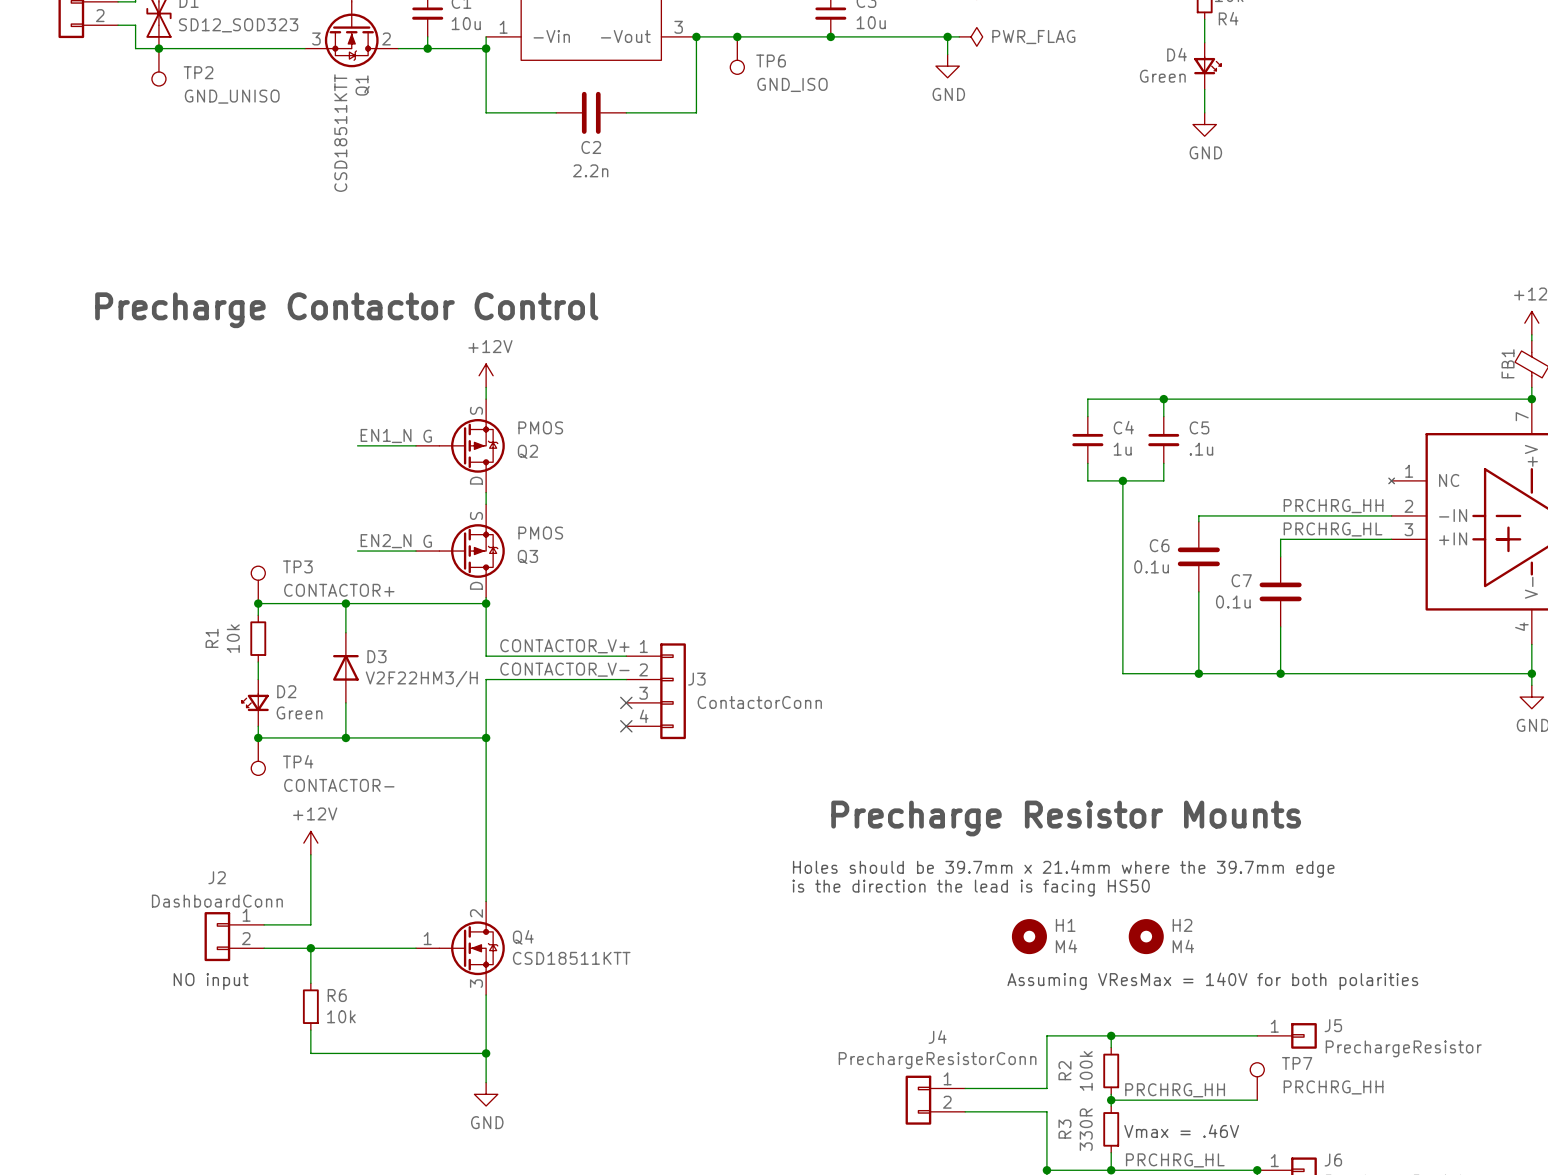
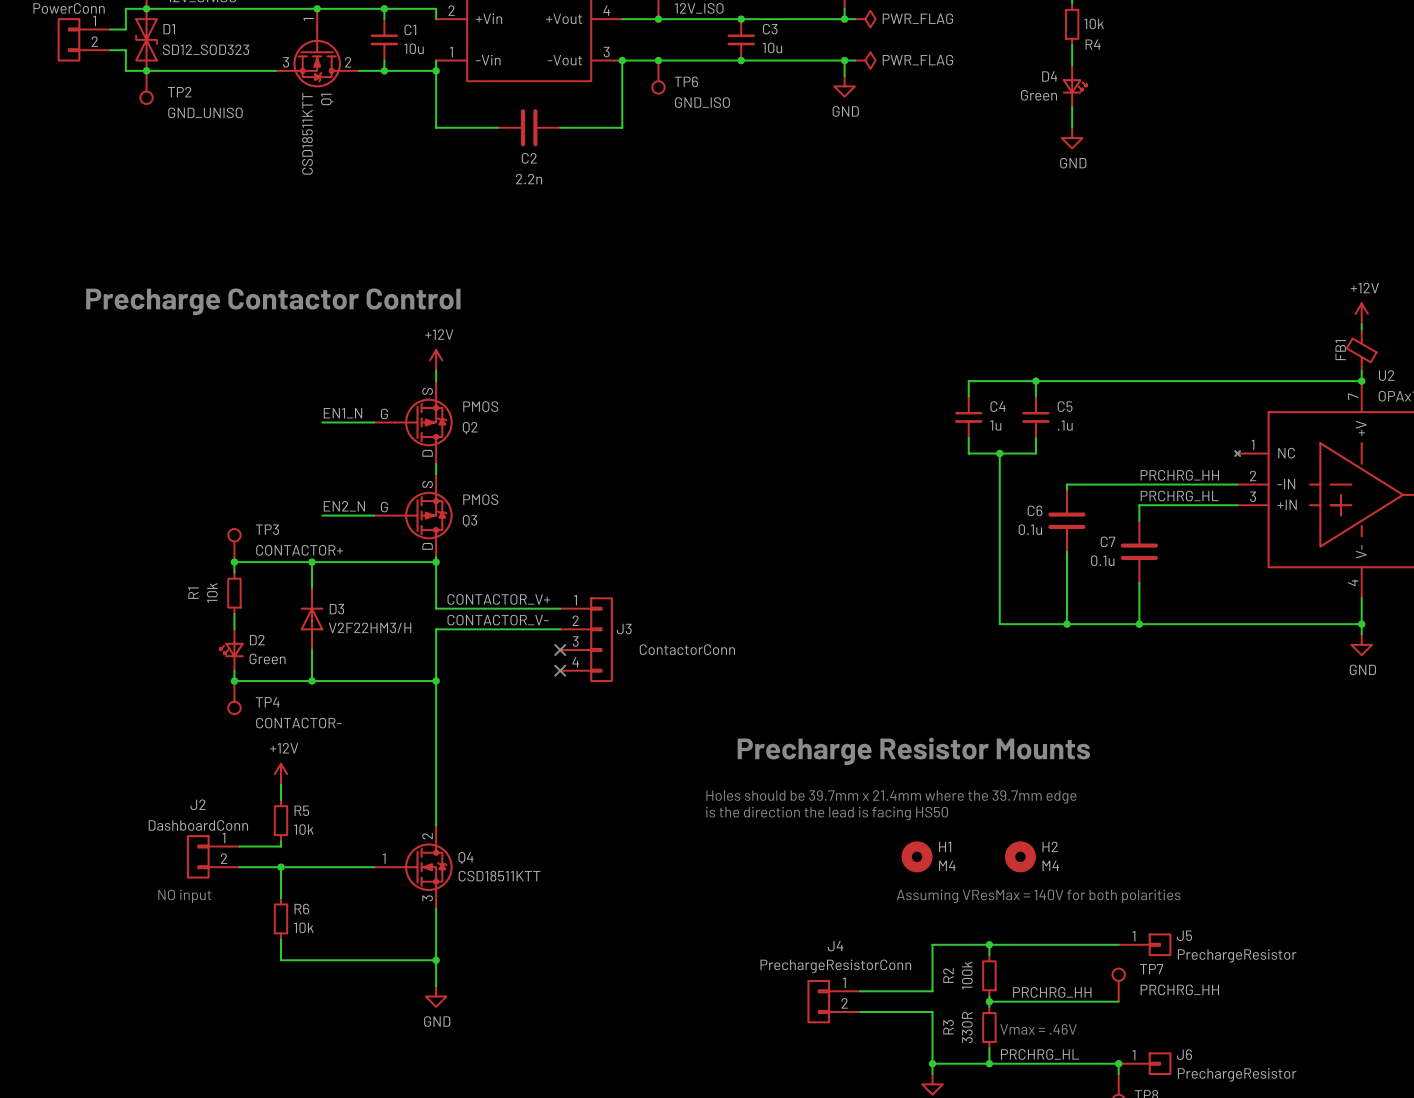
wire: (310, 872) (310, 919) -> none
R5: none -> 10k (280, 820)

